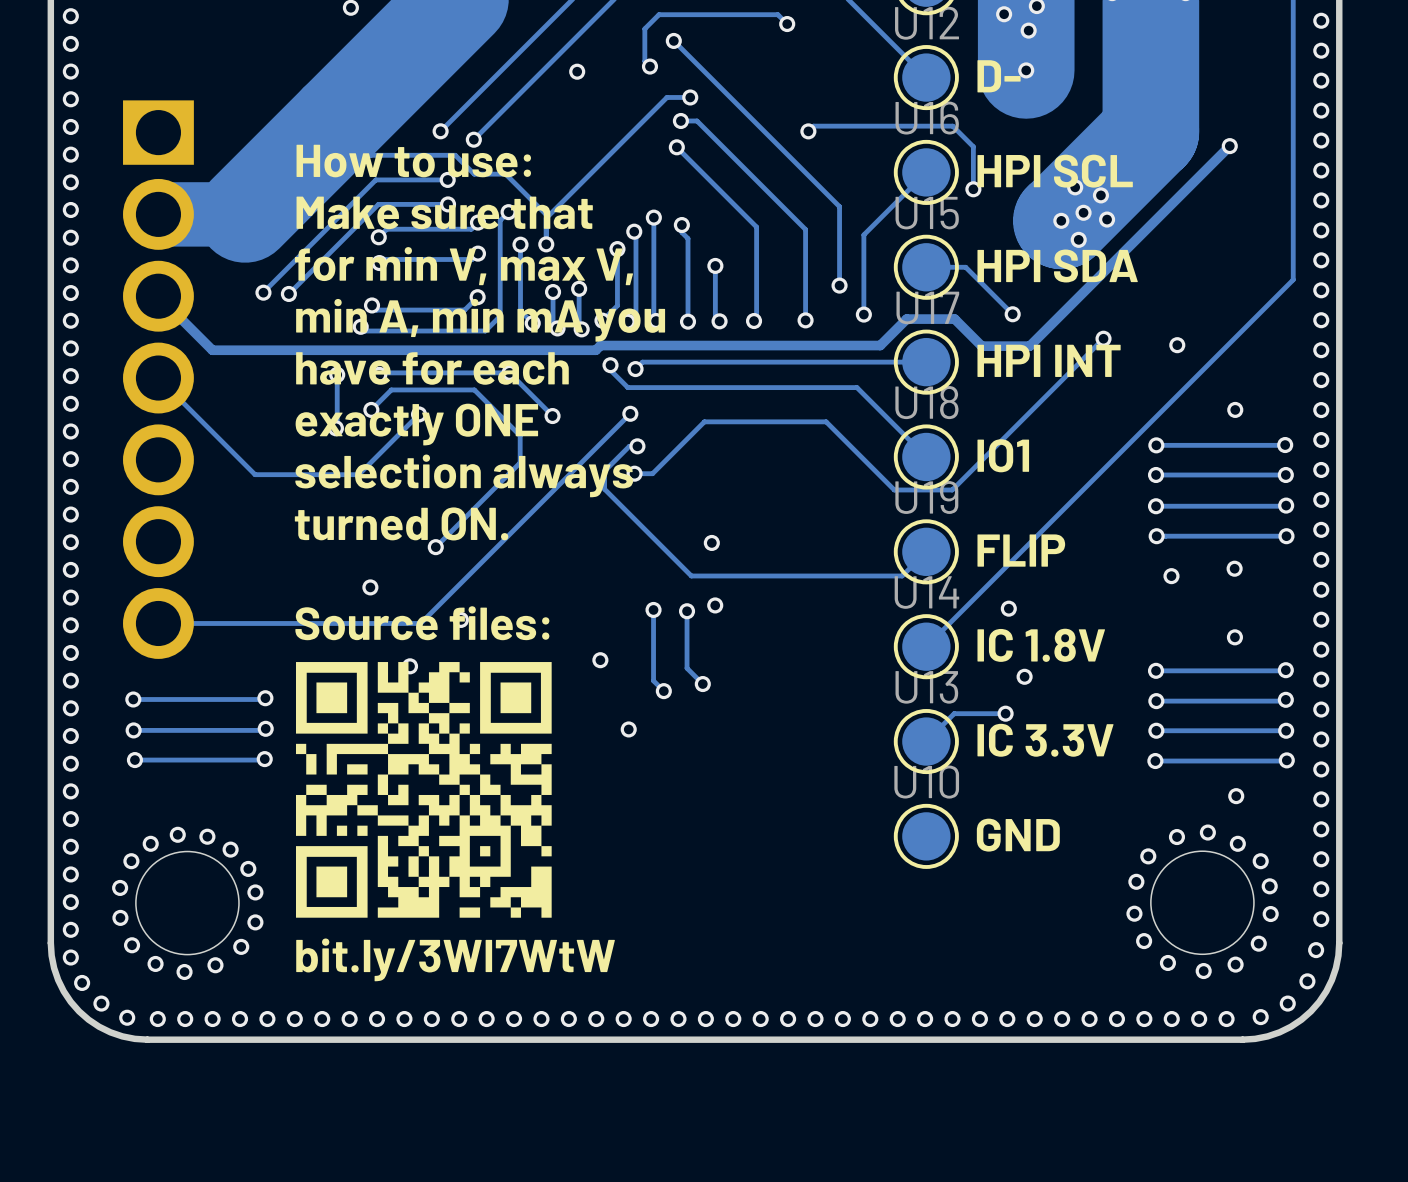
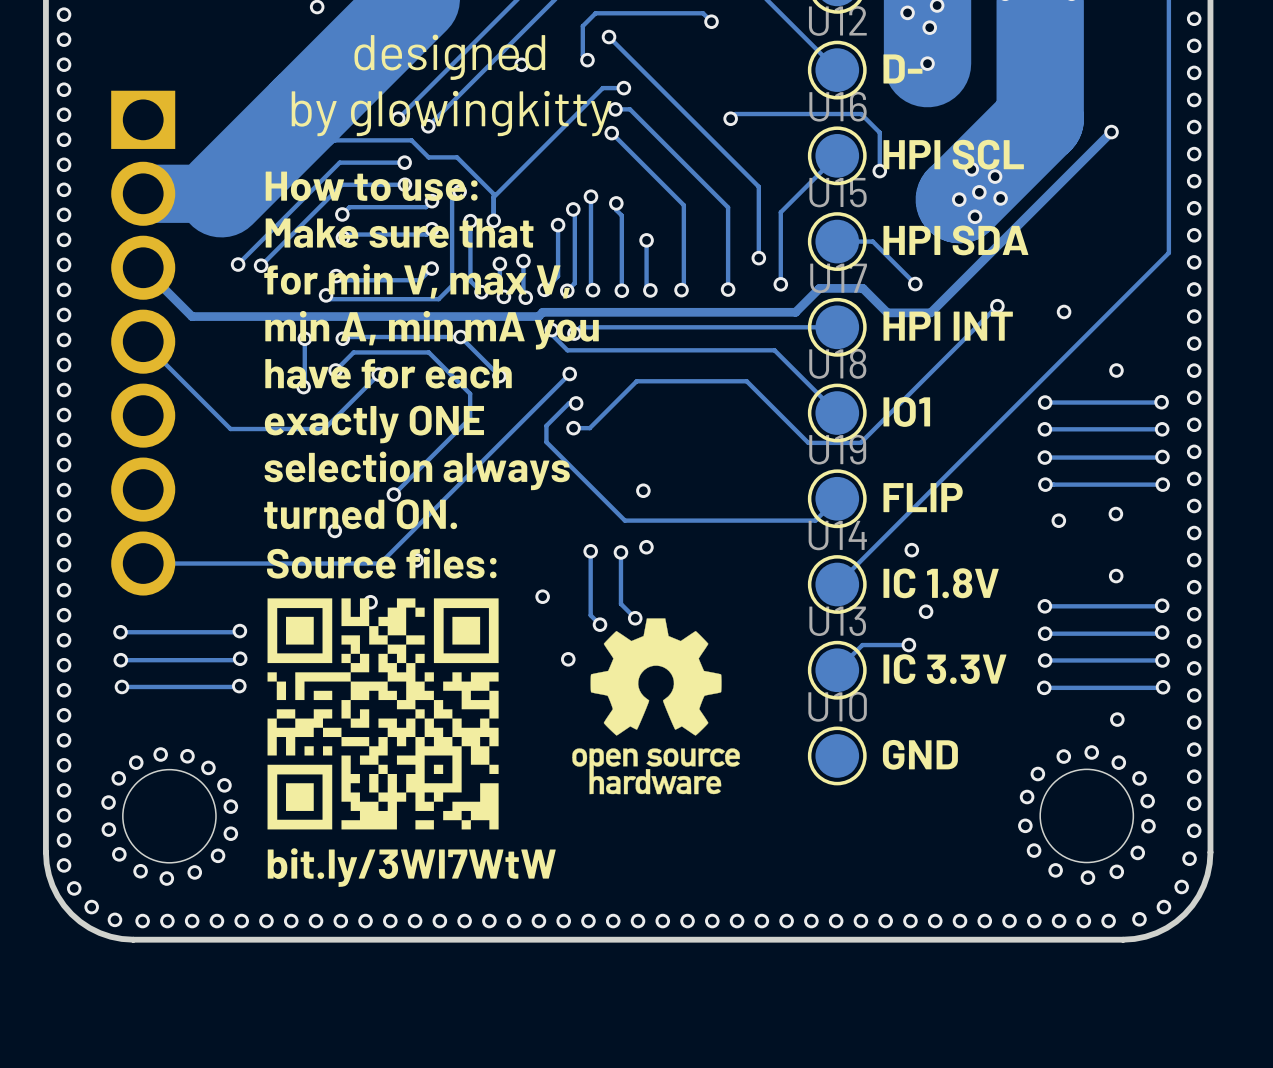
text: none -> designed (449, 57)
text: none -> by glowingkitty (451, 113)
text: How to use: (413, 161) -> none
text: Make sure that (444, 212) -> How to use: (371, 186)
text: for min V, max V, (464, 266) -> Make sure that (399, 233)
text: min A, min mA you (480, 320) -> for min V, max V, (417, 281)
text: have for each (432, 368) -> min A, min mA you (432, 330)
text: exactly ONE (416, 424) -> have for each (388, 373)
text: selection always (464, 475) -> exactly ONE (374, 424)
text: turned ON. (401, 523) -> selection always (417, 470)
text: none -> turned ON. (360, 514)
drawing: none -> [572, 618, 740, 795]

